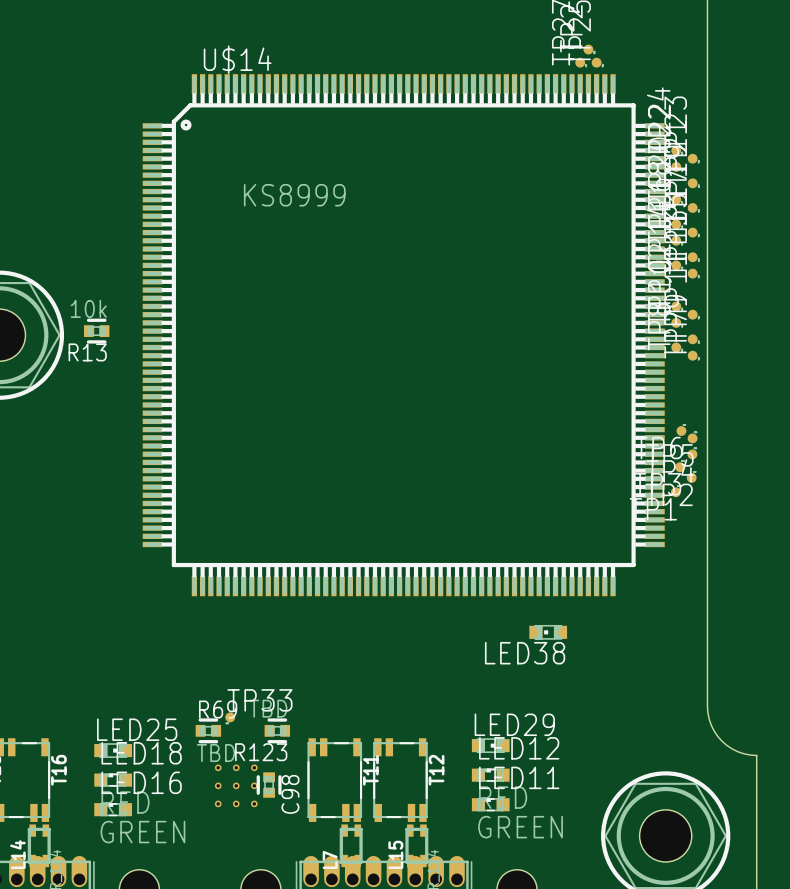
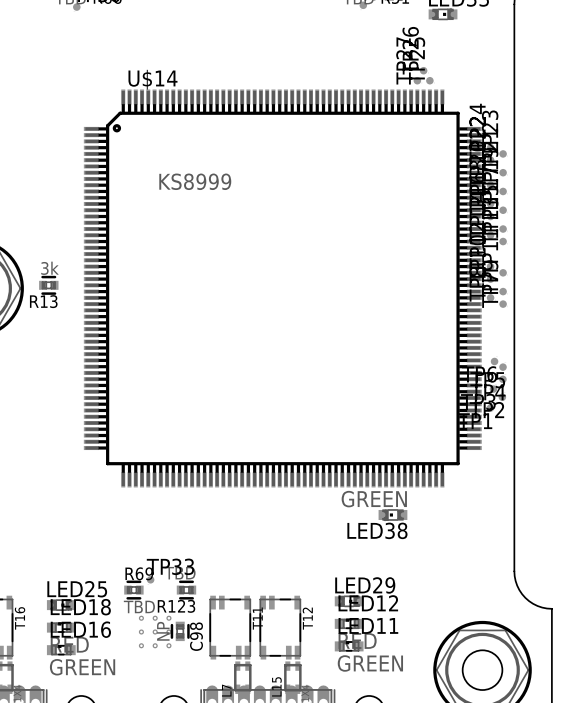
R13 value: 10k (88, 308) -> 3k (50, 268)
LED38 value: none -> GREEN (374, 499)
C98 value: none -> NP (163, 631)

